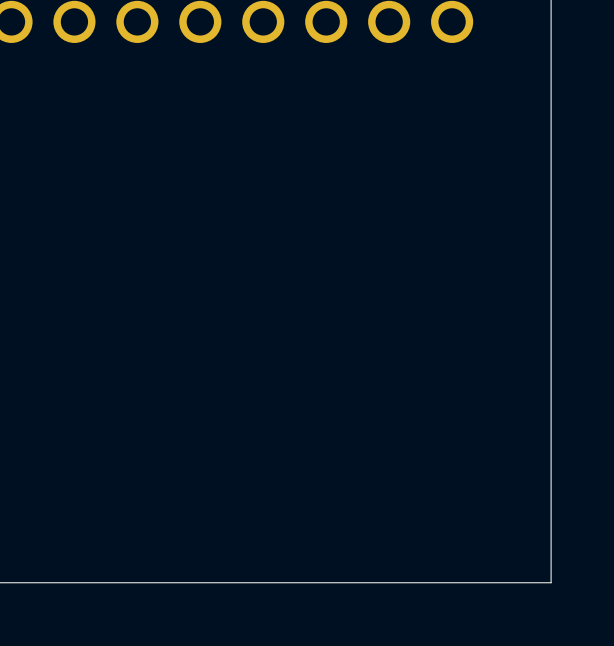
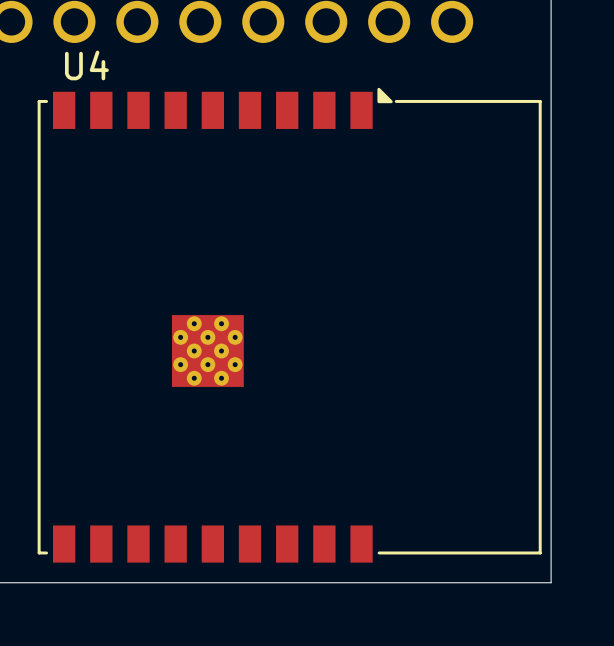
U4: none -> (289, 325)

